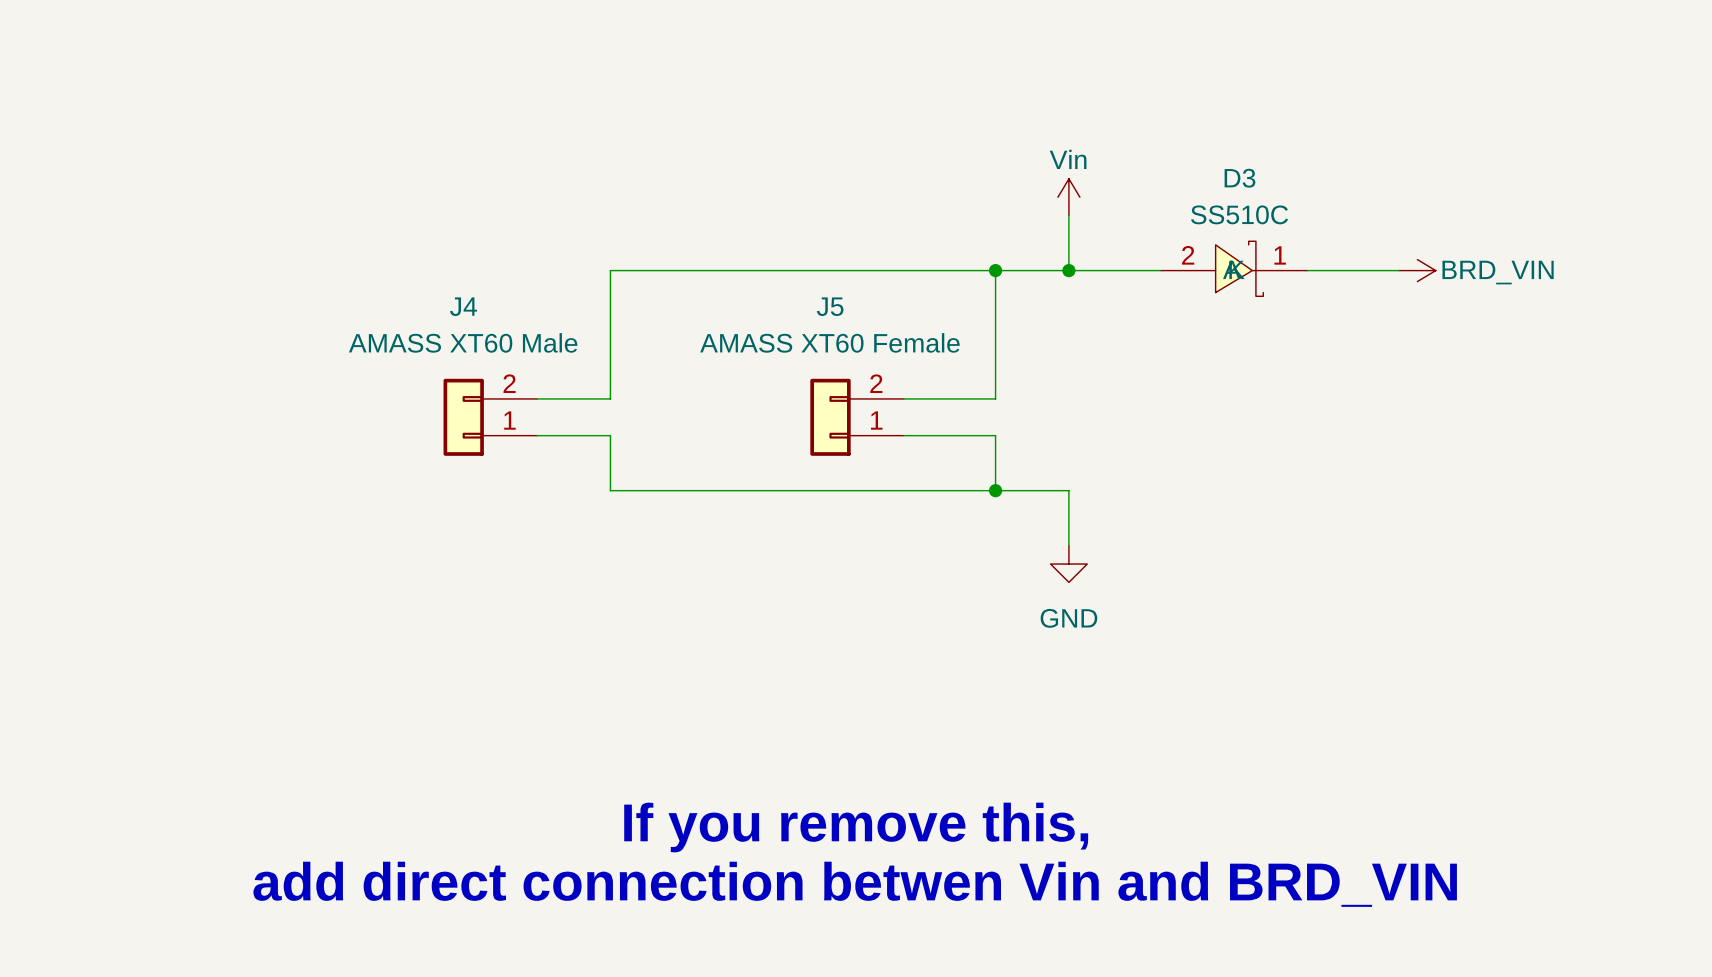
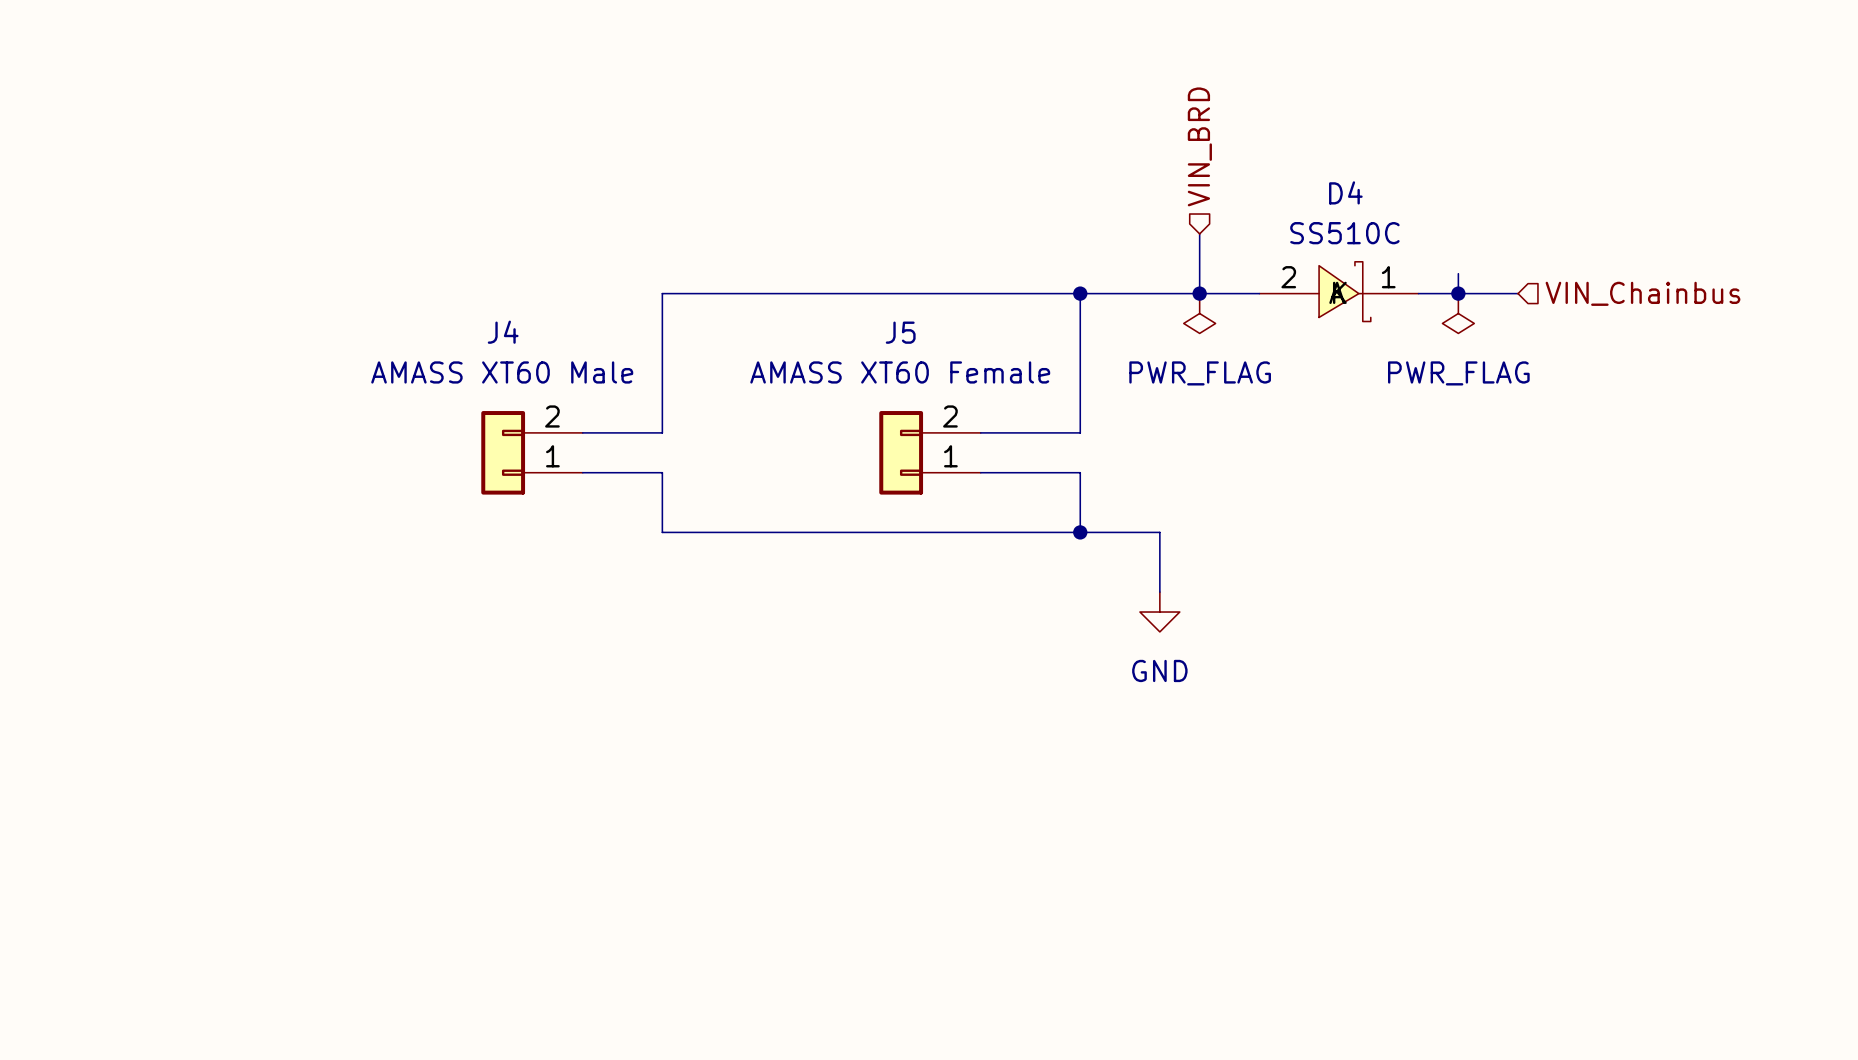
hierarchical label: none -> VIN_BRD (1199, 146)
D3 name: D3 (1239, 178) -> D4 (1345, 192)
power symbol: Vin (1068, 197) -> none
wire: (1068, 215) (1068, 270) -> (1199, 233) (1199, 293)
wire: none -> (1458, 273) (1458, 293)
junction position: (1068, 270) -> (1199, 293)
junction: none -> (1458, 293)
power symbol: BRD_VIN (1417, 270) -> none
hierarchical label: none -> VIN_Chainbus (1642, 293)
power symbol: none -> PWR_FLAG (1199, 313)
power symbol: none -> PWR_FLAG (1458, 313)
text: If you remove this, (856, 827) -> none
text: add direct connection betwen Vin and BRD_VIN (855, 884) -> none

